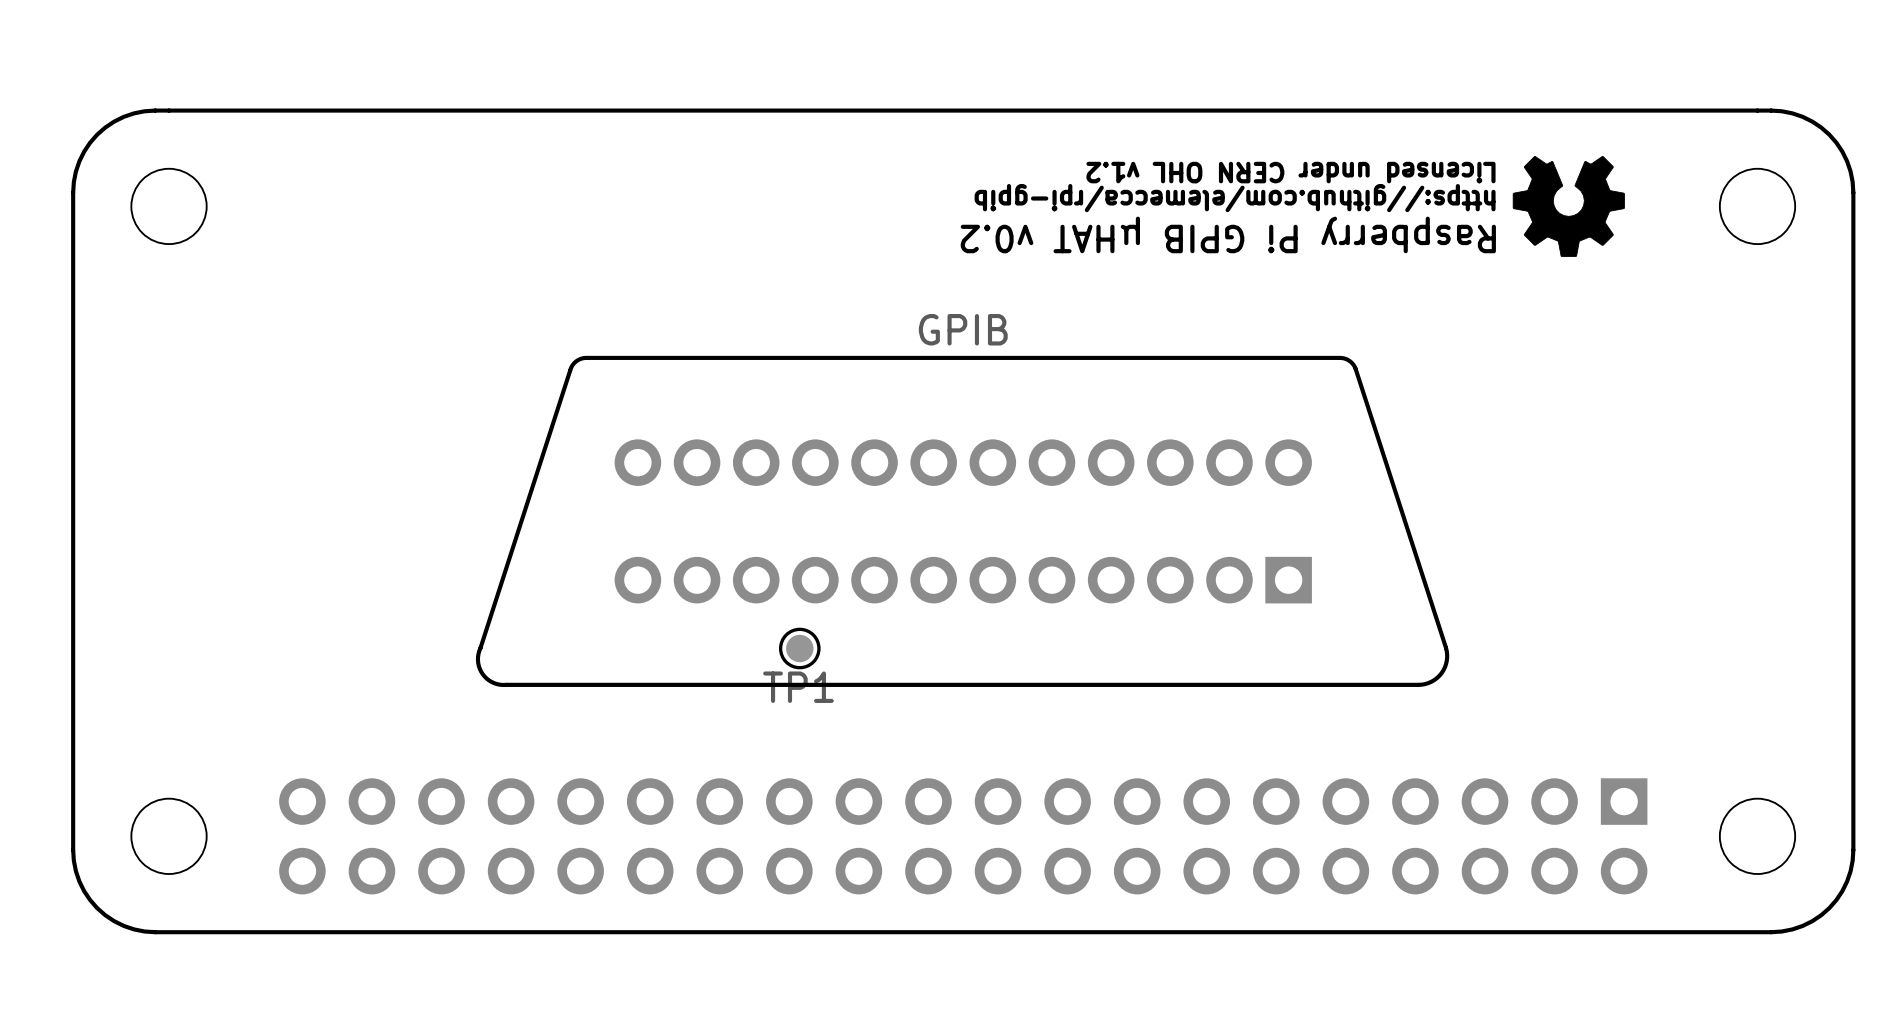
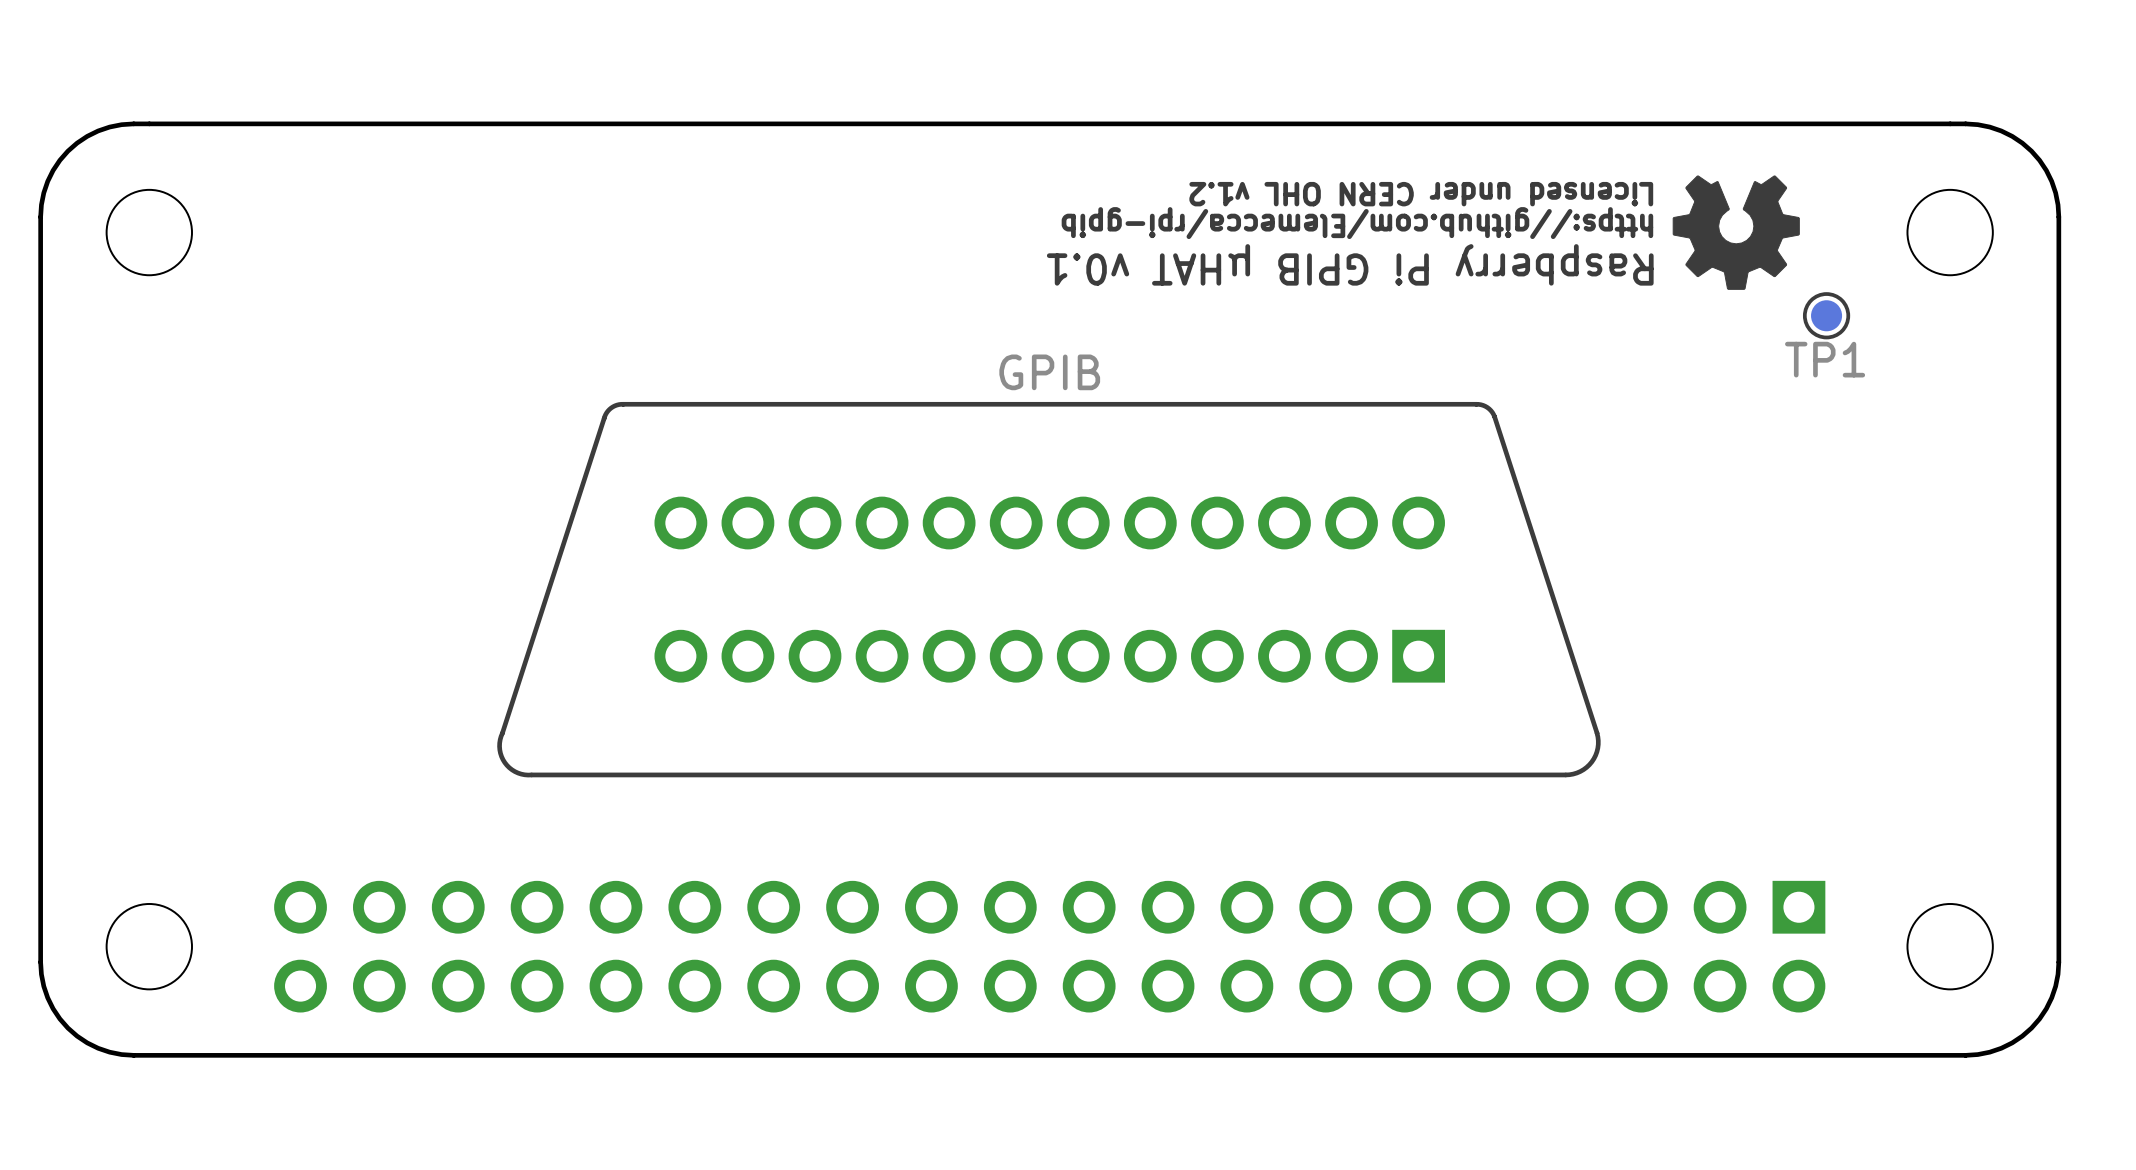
text: https://github.com/elemecca/rpi-gpib (1235, 198) -> https://github.com/Elemecca/rpi-gpib (1357, 223)
text: Raspberry Pi GPIB µHAT v0.2 (1228, 234) -> Raspberry Pi GPIB µHAT v0.1 (1350, 264)
TP1 position: (799, 648) -> (1826, 315)

